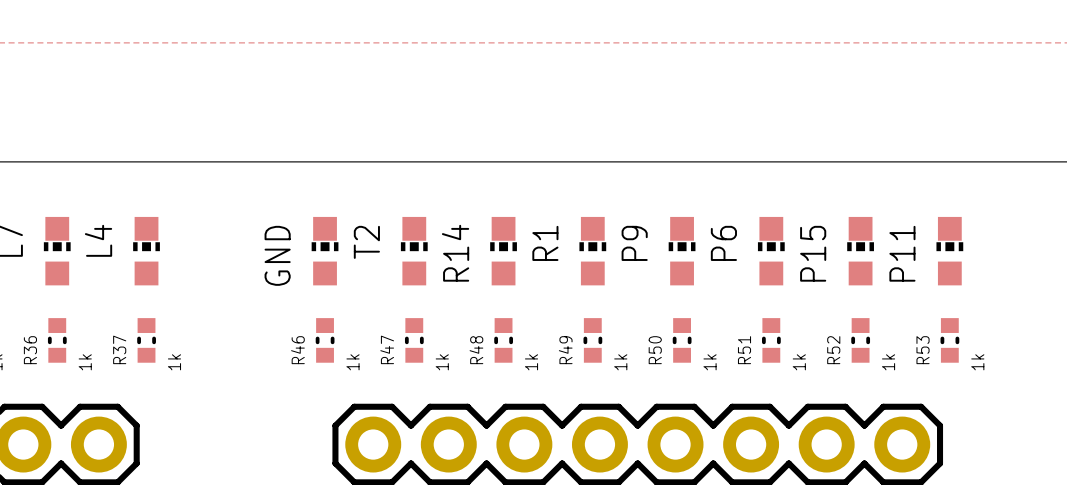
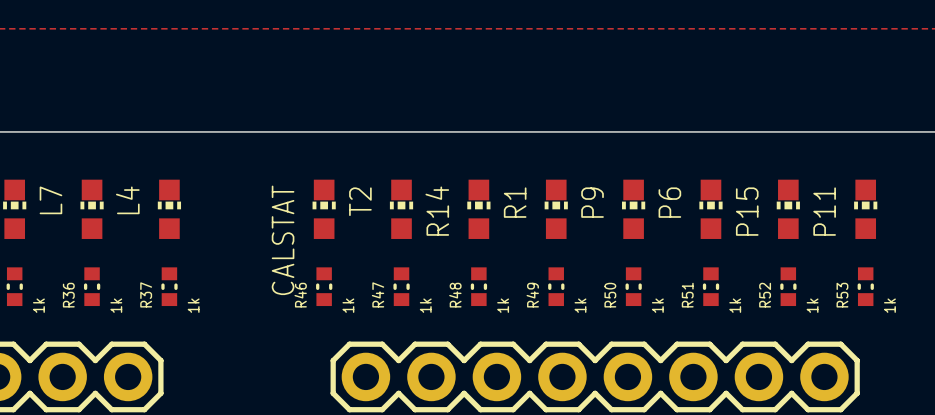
text: GND (277, 255) -> CALSTAT (283, 240)

